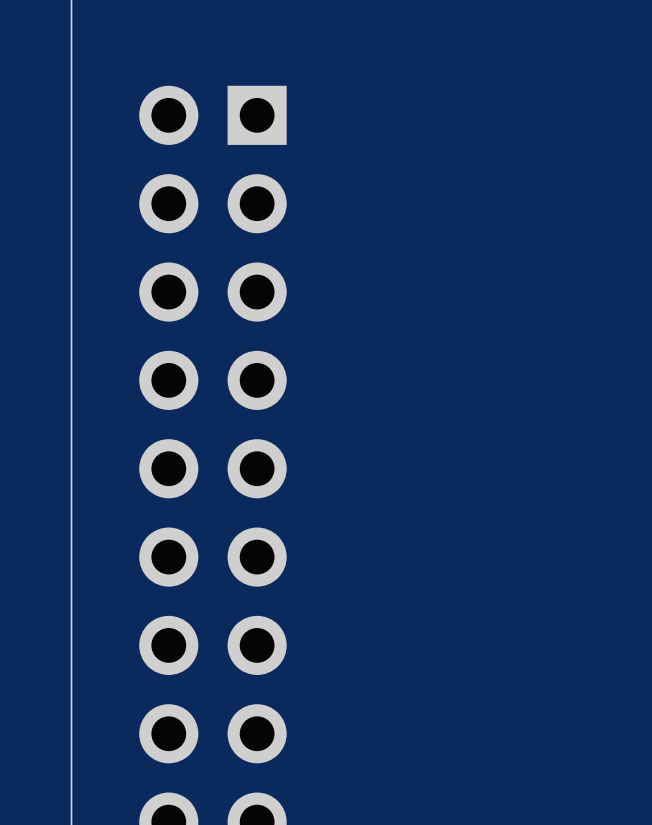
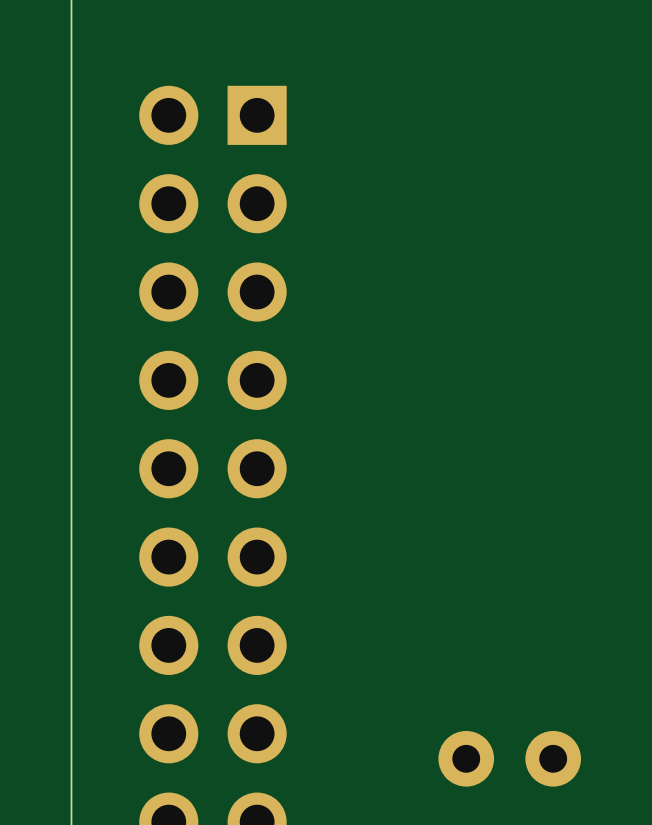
part: none -> (509, 758)

